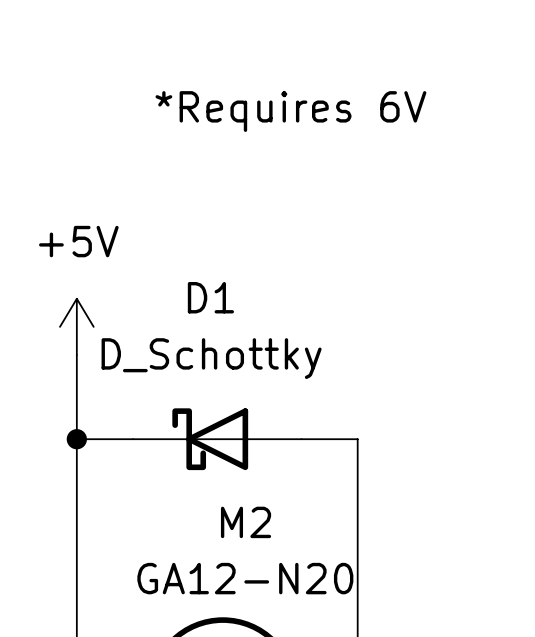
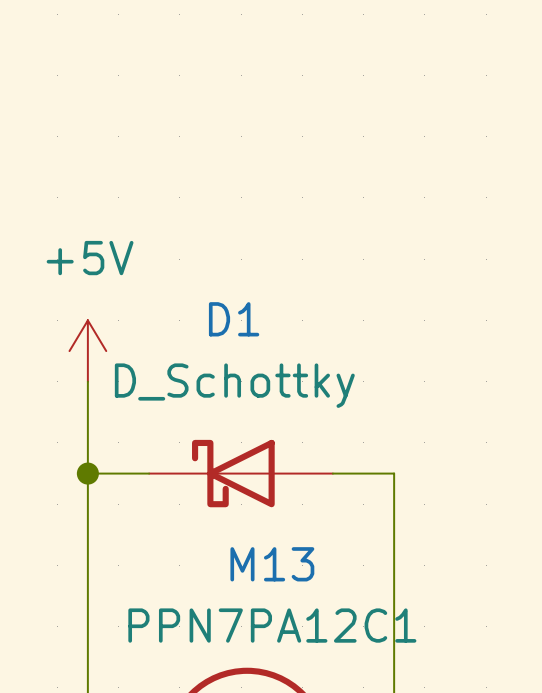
text: *Requires 6V (290, 111) -> none
M2 name: M2 (246, 522) -> M13 (272, 564)
M2 value: GA12-N20 (245, 578) -> PPN7PA12C1 (272, 625)

